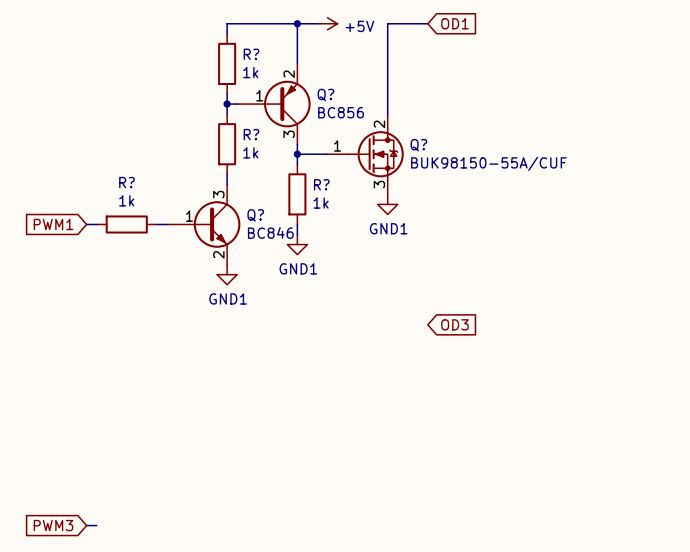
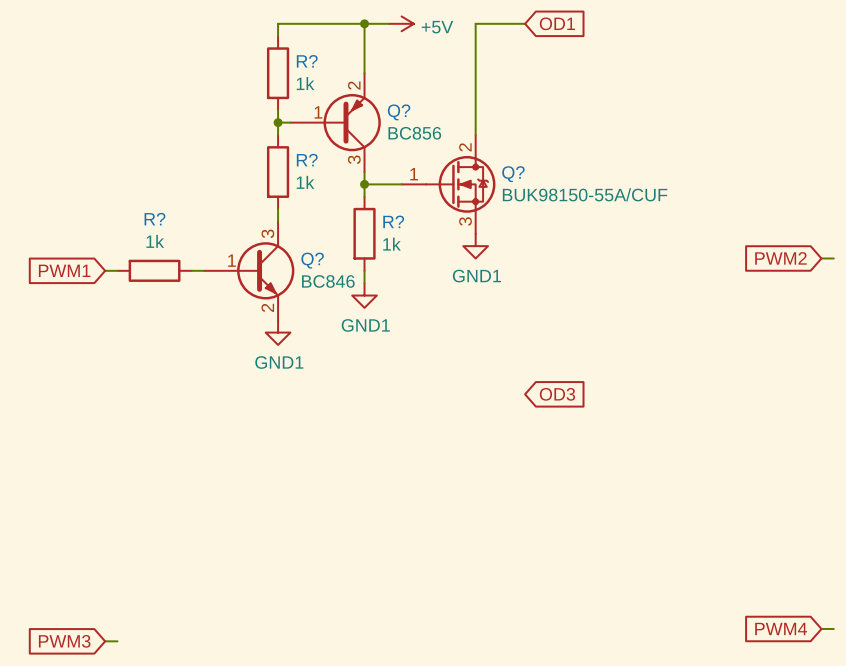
global label: none -> PWM2 (780, 258)
wire: none -> (821, 258) (833, 258)
global label: none -> PWM4 (781, 628)
wire: none -> (821, 628) (833, 628)

